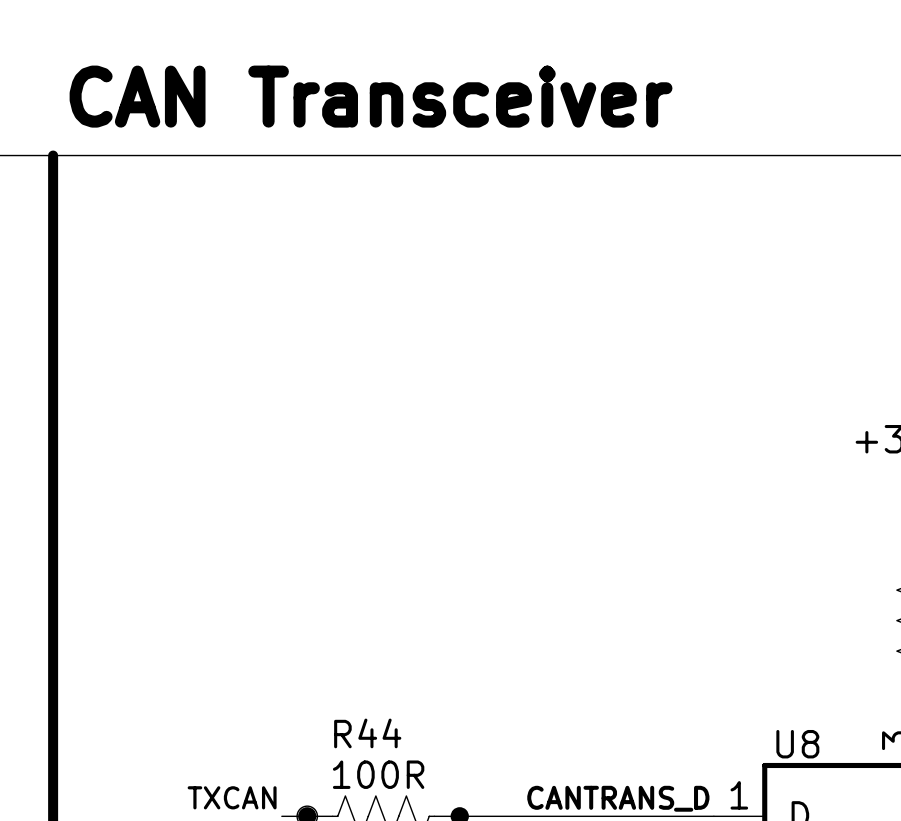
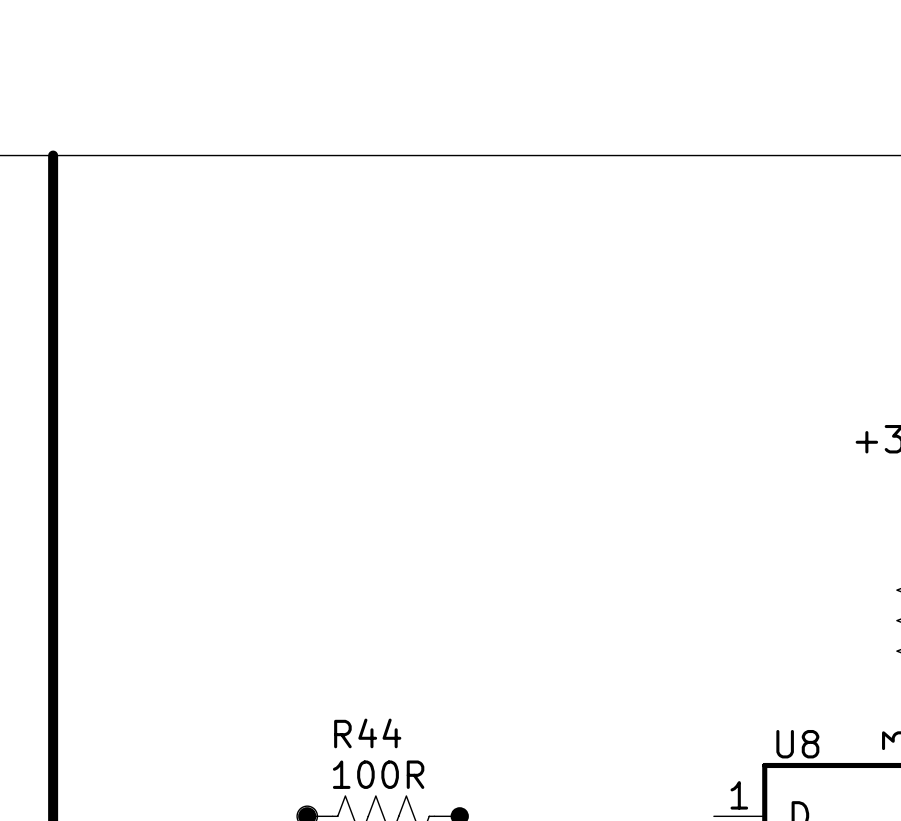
text: CAN Transceiver (371, 96) -> none
label: TXCAN (232, 797) -> none
label: CANTRANS_D (618, 798) -> none
wire: (281, 816) (307, 816) -> none
wire: (459, 816) (713, 816) -> none

